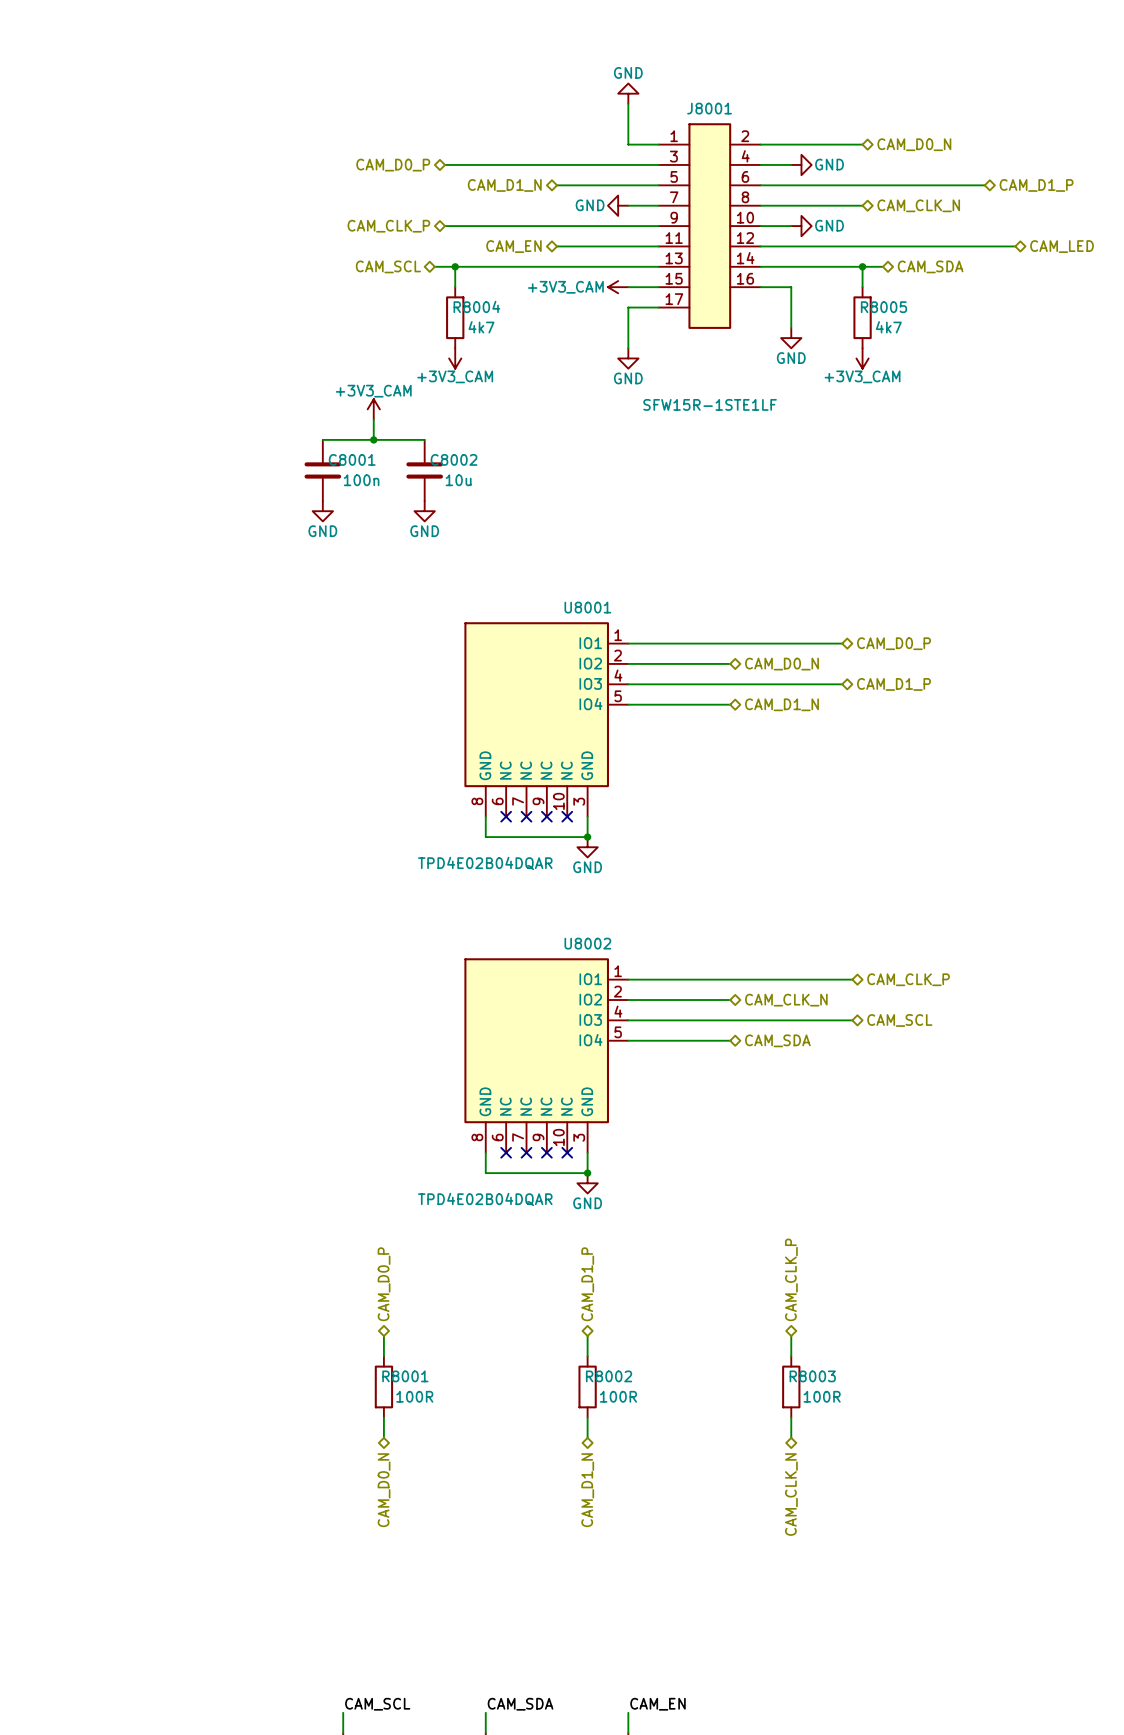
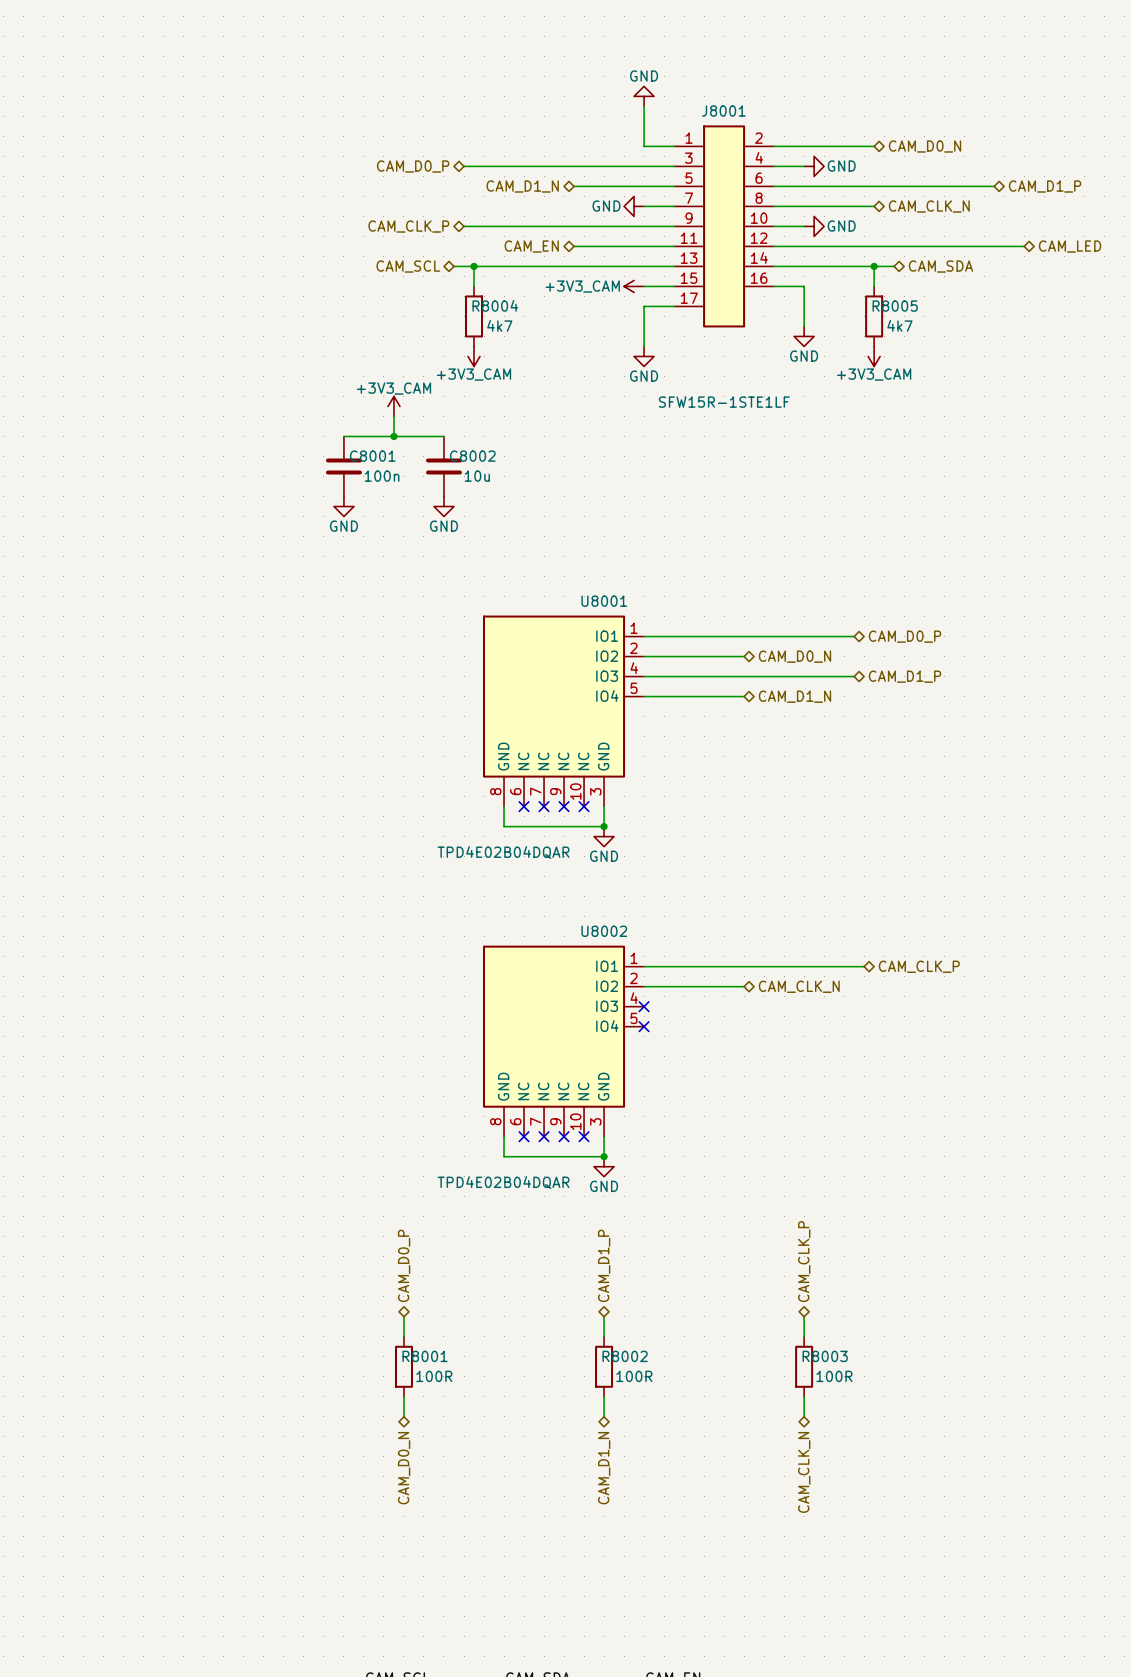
wire: (628, 1020) (852, 1020) -> none
no-connect mark: none -> (644, 1006)
hierarchical label: CAM_SCL (899, 1020) -> none
wire: (628, 1040) (730, 1040) -> none
no-connect mark: none -> (644, 1026)
hierarchical label: CAM_SDA (777, 1040) -> none

